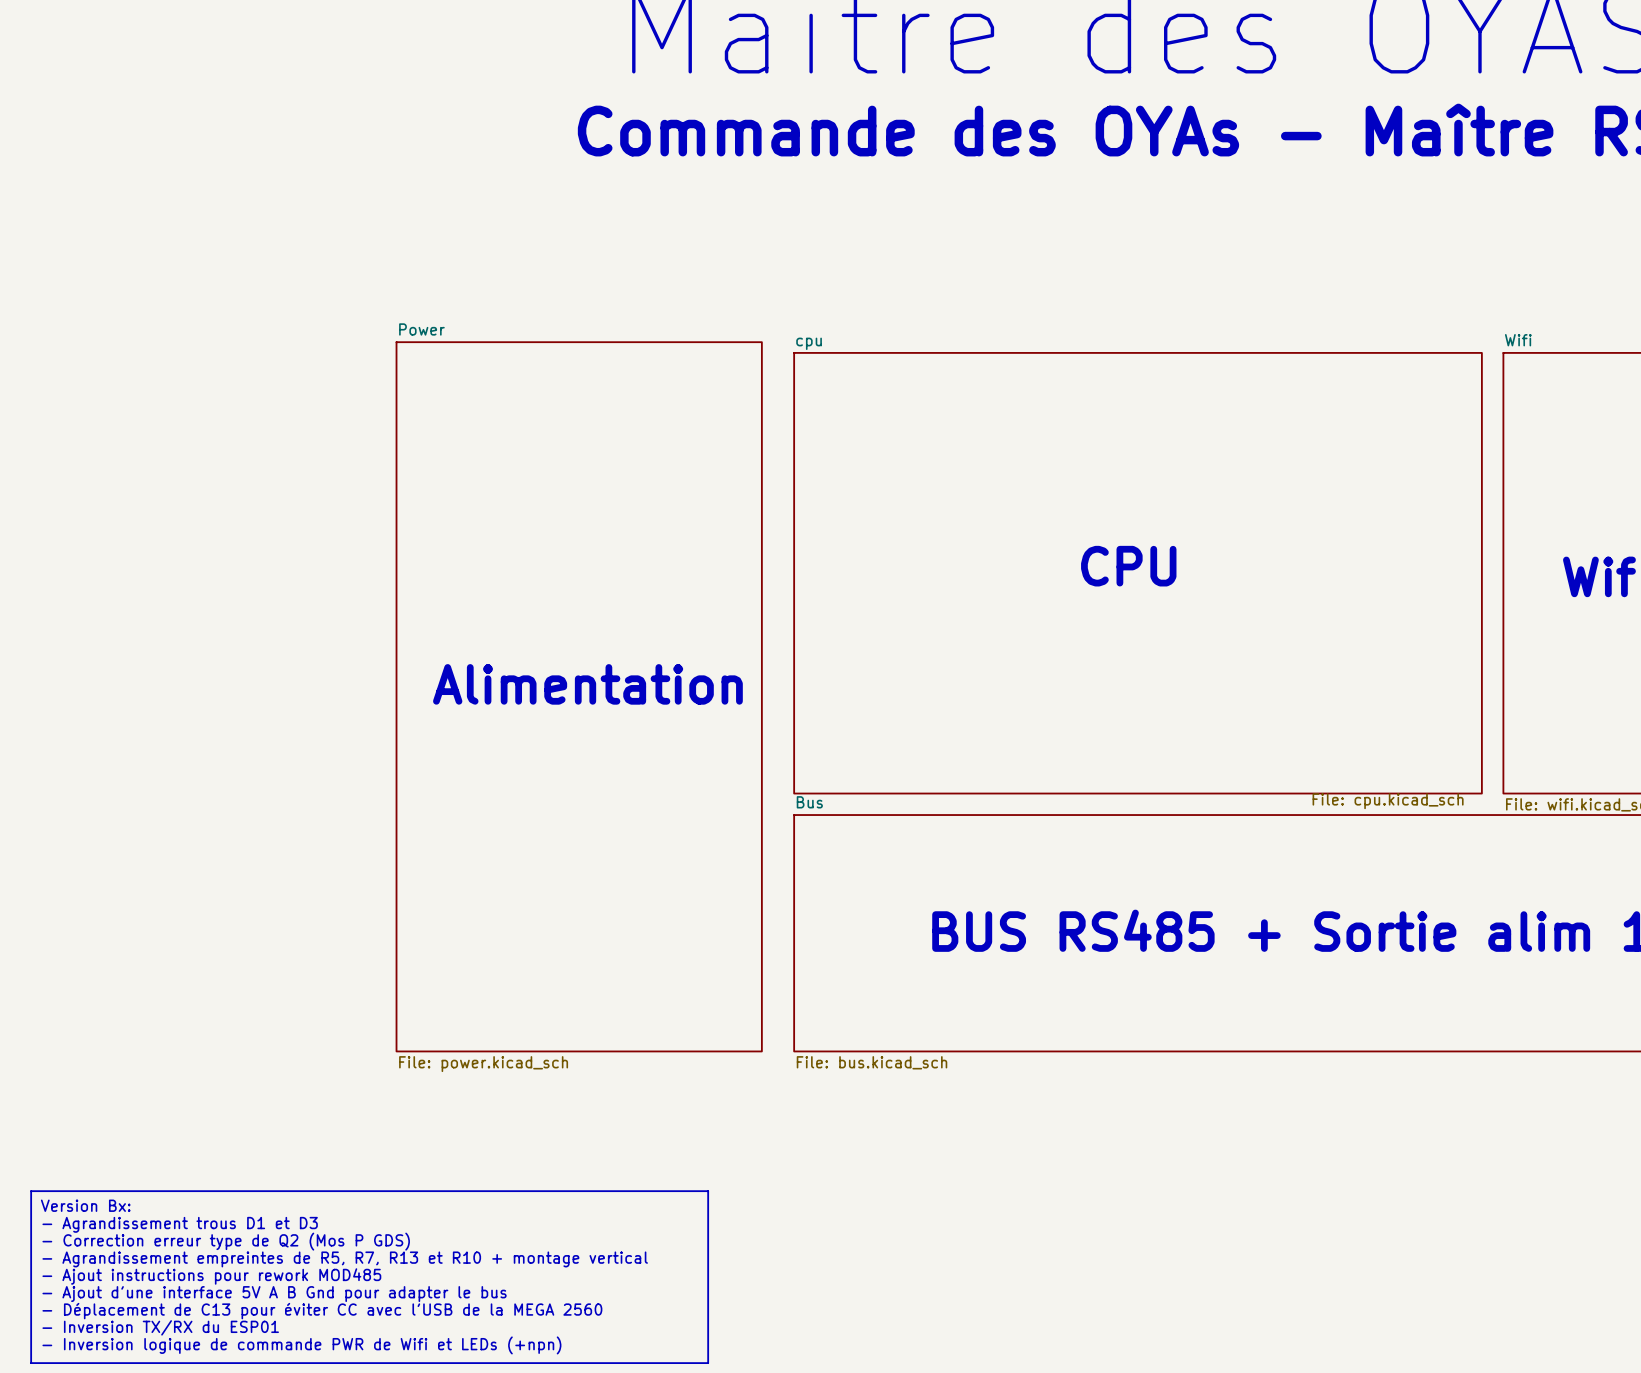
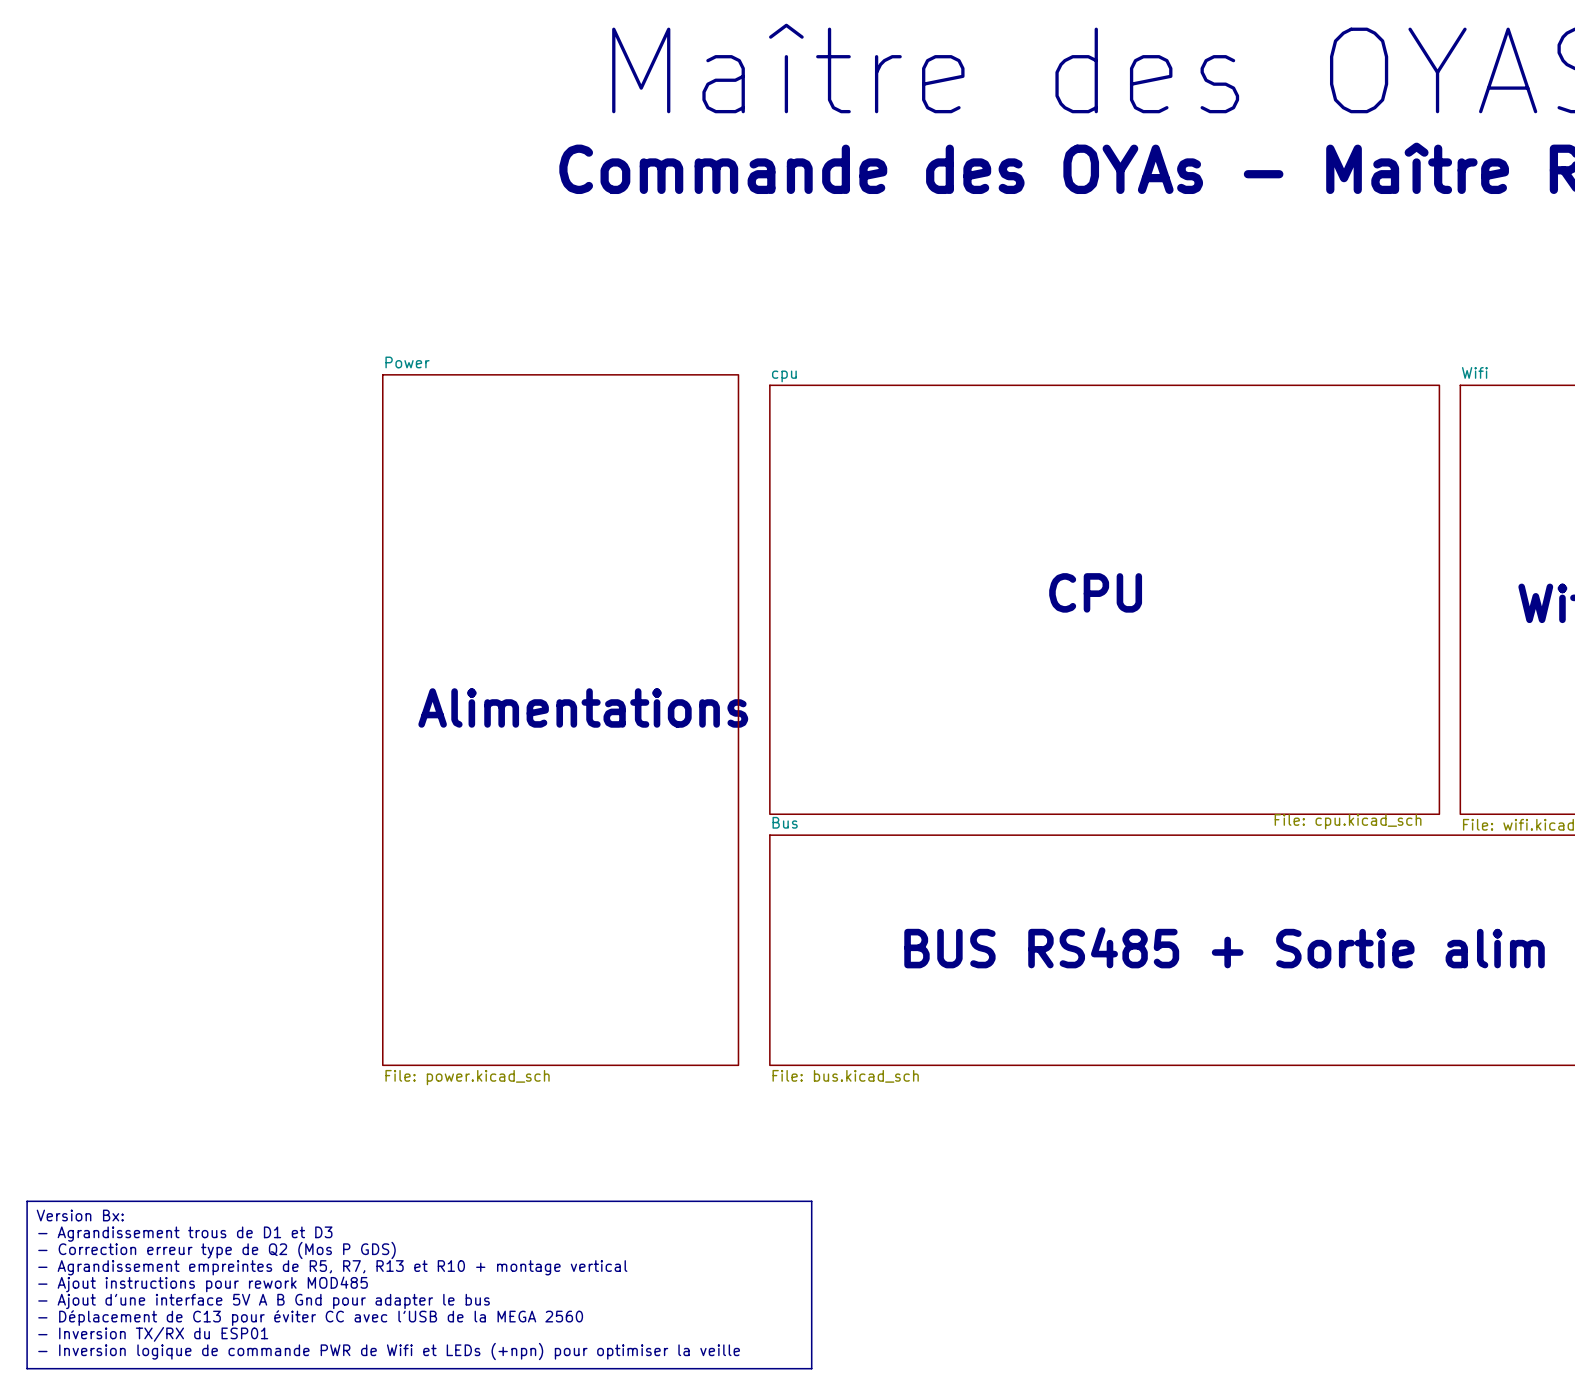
text: Alimentation (587, 684) -> Alimentations (583, 707)
line: (708, 1191) (708, 1363) -> (686, 1201) (811, 1201) (811, 1368) (686, 1368)
text: - Agrandissement trous D1 et D3 (180, 1224) -> - Agrandissement trous de D1 et D3 (185, 1234)
text: - Inversion logique de commande PWR de Wifi et LEDs (+npn) (301, 1345) -> - Inversion logique de commande PWR de Wifi et LEDs (+npn) pour optimiser la veille (389, 1351)

